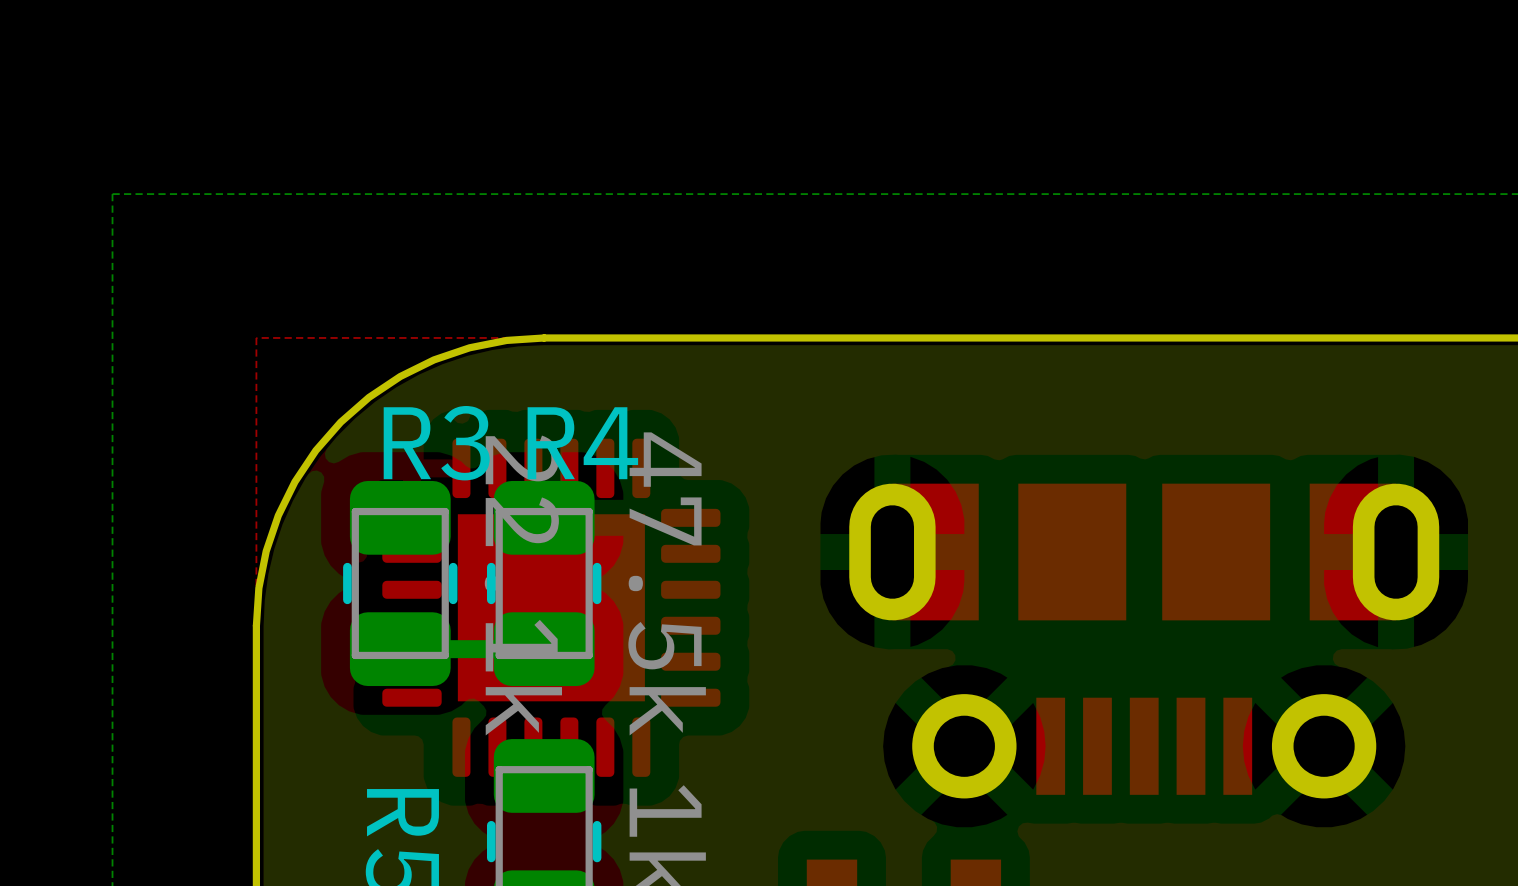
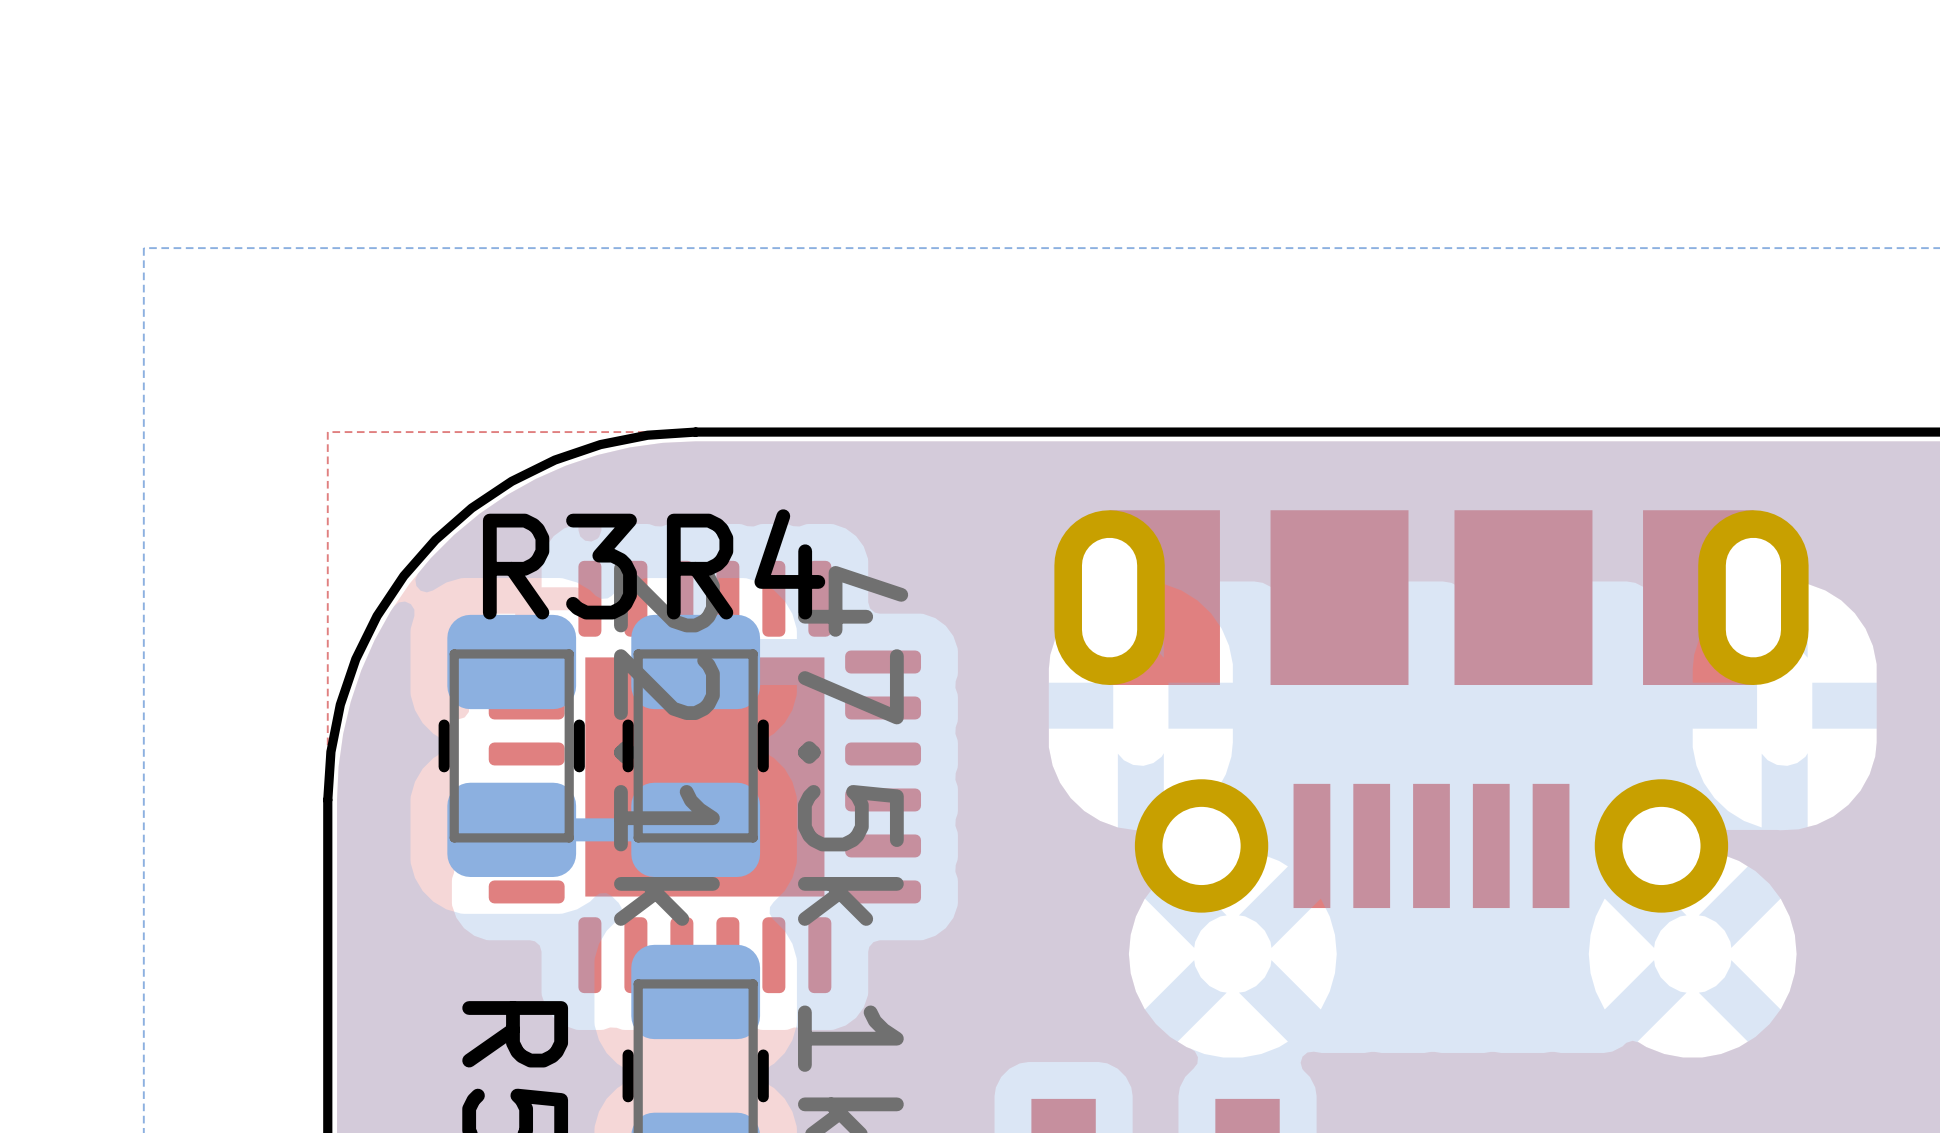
part position: (1144, 641) -> (1431, 711)

